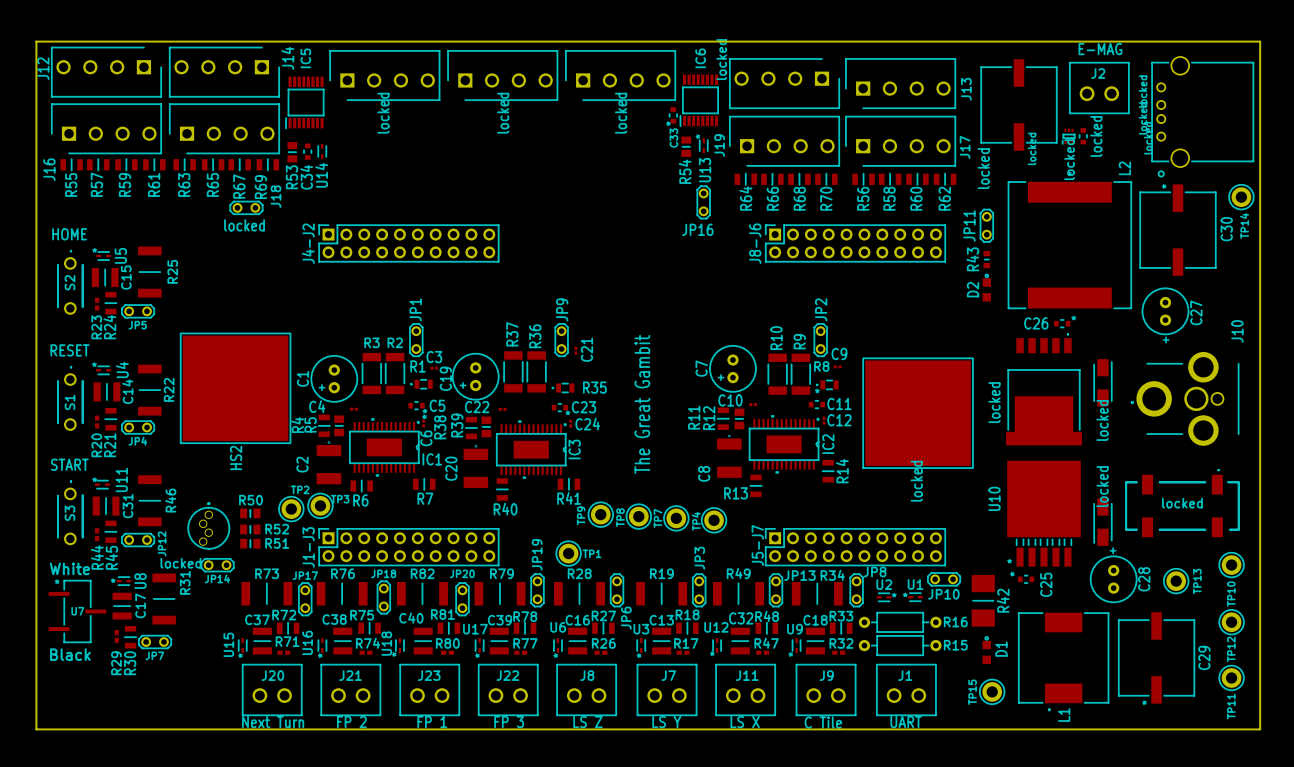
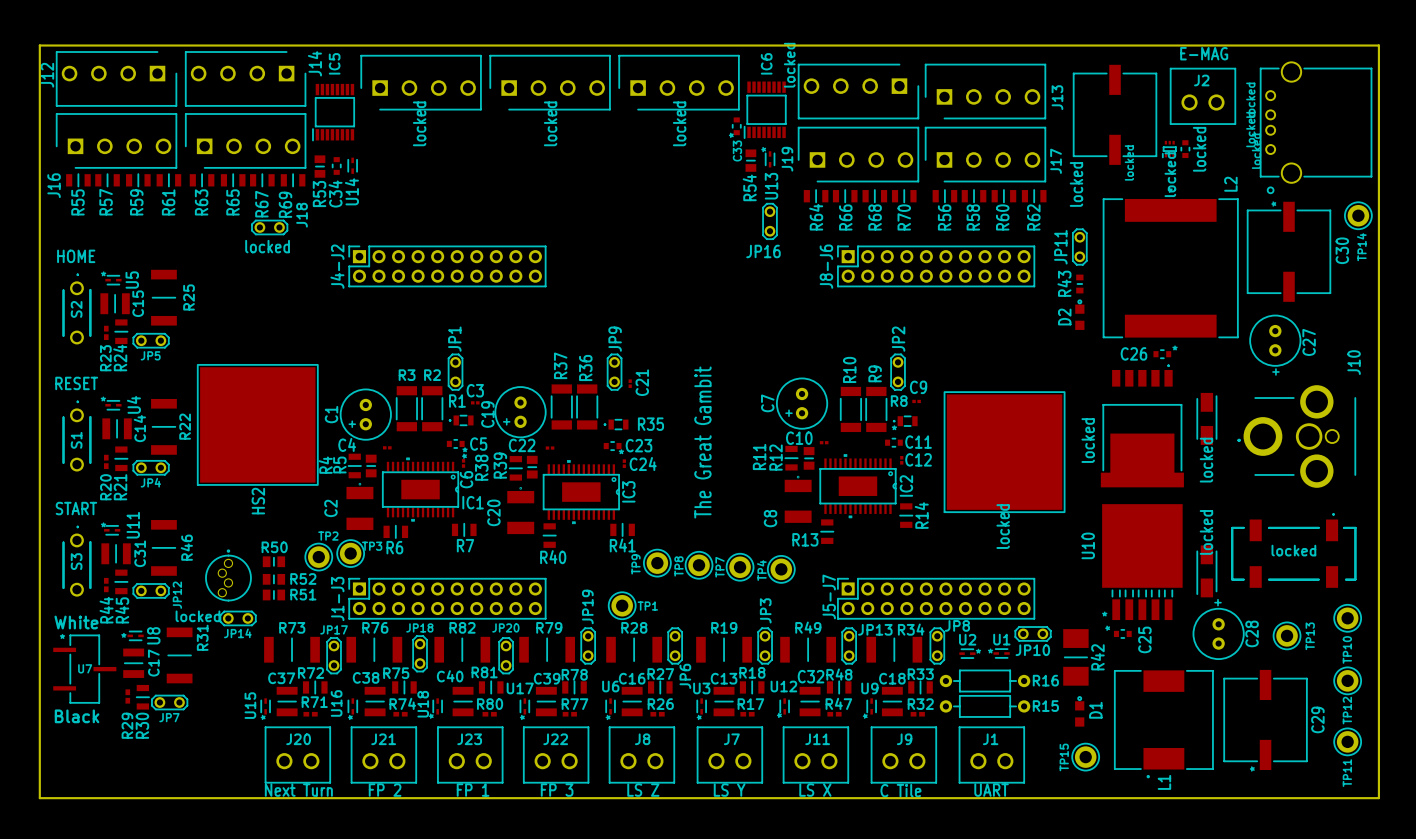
IC2 footprint: [749, 415, 820, 474] -> [819, 454, 897, 519]
IC1 footprint: [349, 418, 420, 477] -> [382, 457, 459, 522]
IC3 footprint: [496, 420, 567, 479] -> [543, 460, 620, 525]

